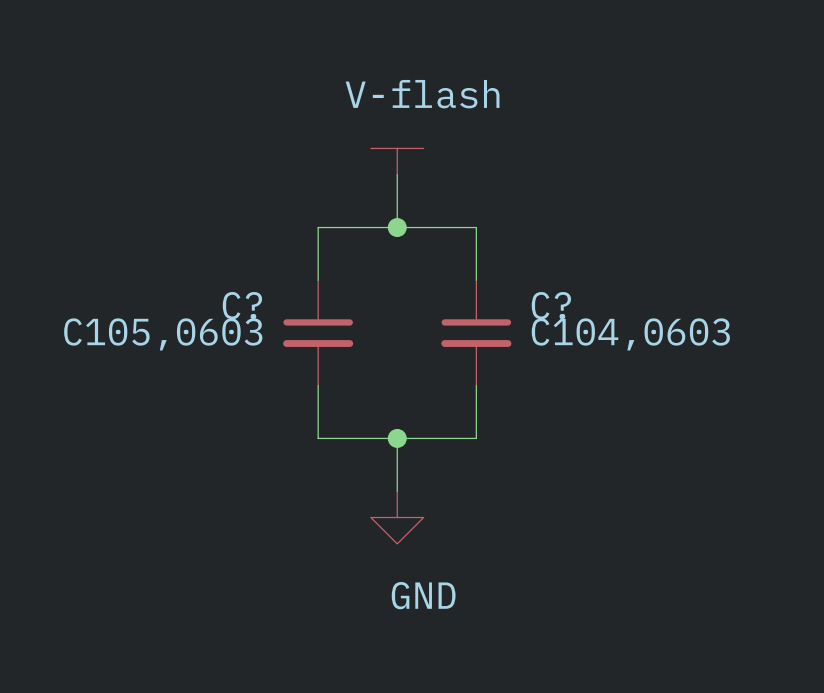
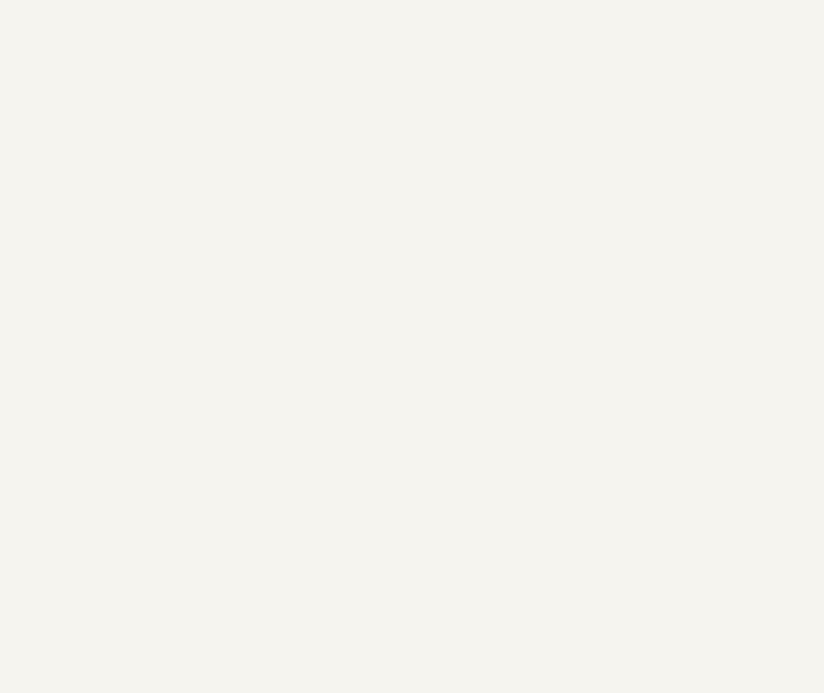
power symbol: V-flash (397, 161) -> none
wire: (397, 174) (397, 227) -> none
junction: (397, 227) -> none
wire: (318, 280) (318, 227) (476, 227) (476, 280) -> none
C?: C105,0603 (318, 332) -> none
C?: C104,0603 (476, 332) -> none
wire: (318, 385) (318, 438) (476, 438) (476, 385) -> none
wire: (397, 438) (397, 491) -> none
junction: (397, 438) -> none
power symbol: GND (397, 517) -> none

